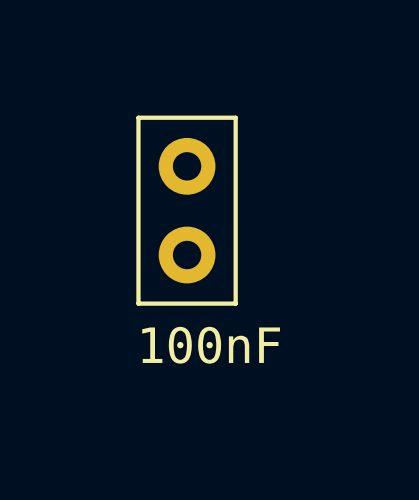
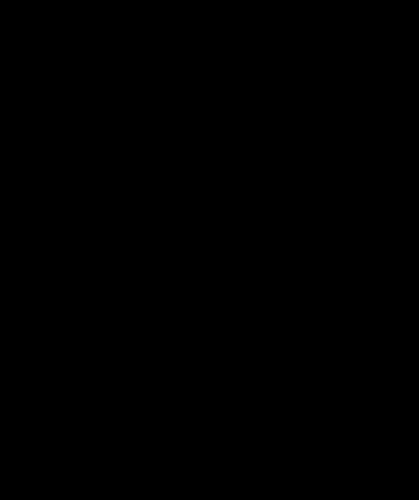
part: 100nF (187, 210) -> none

